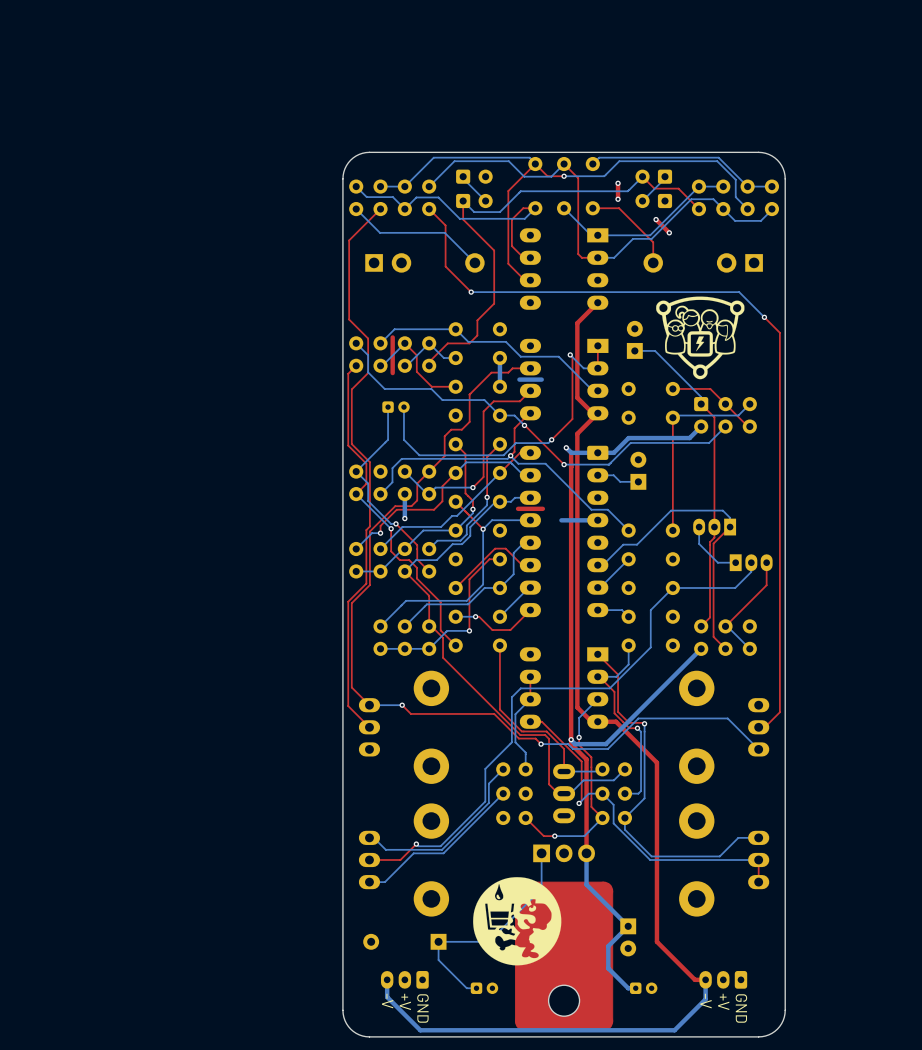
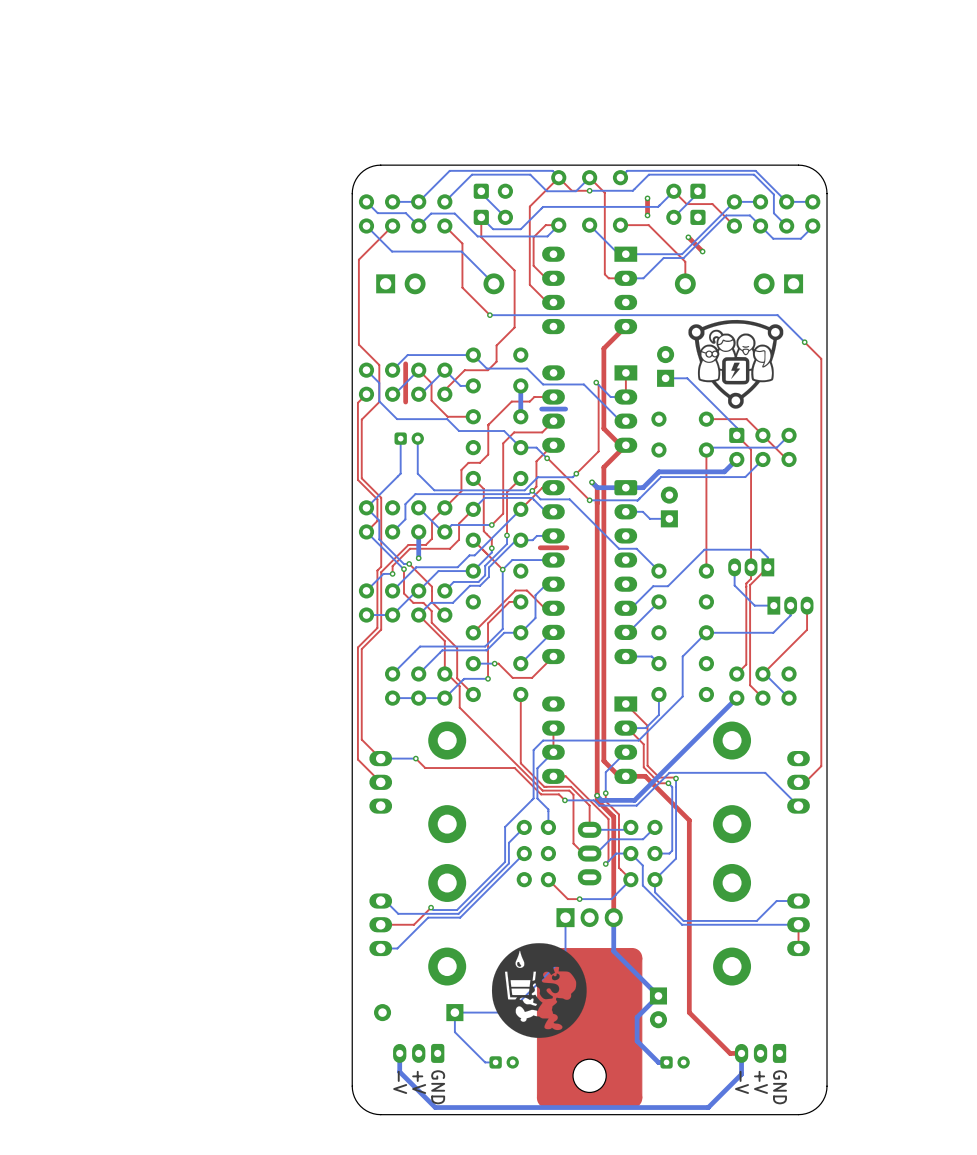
bottom track: (597, 520) (561, 520) -> none

